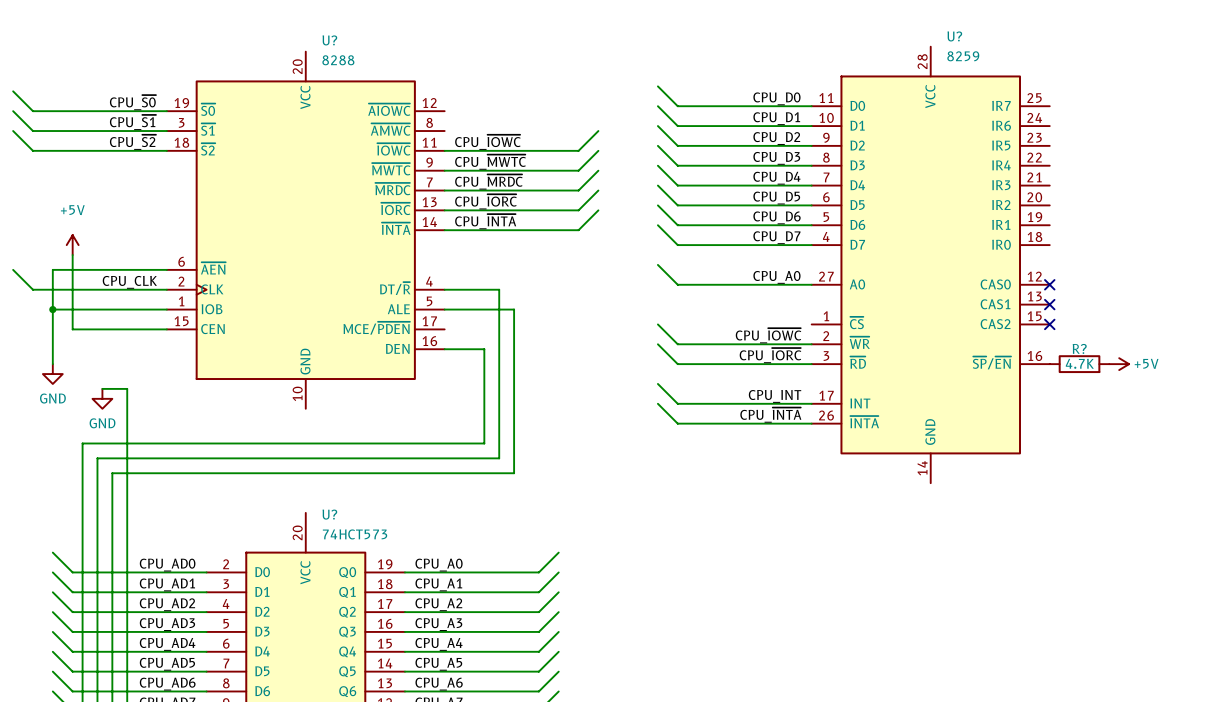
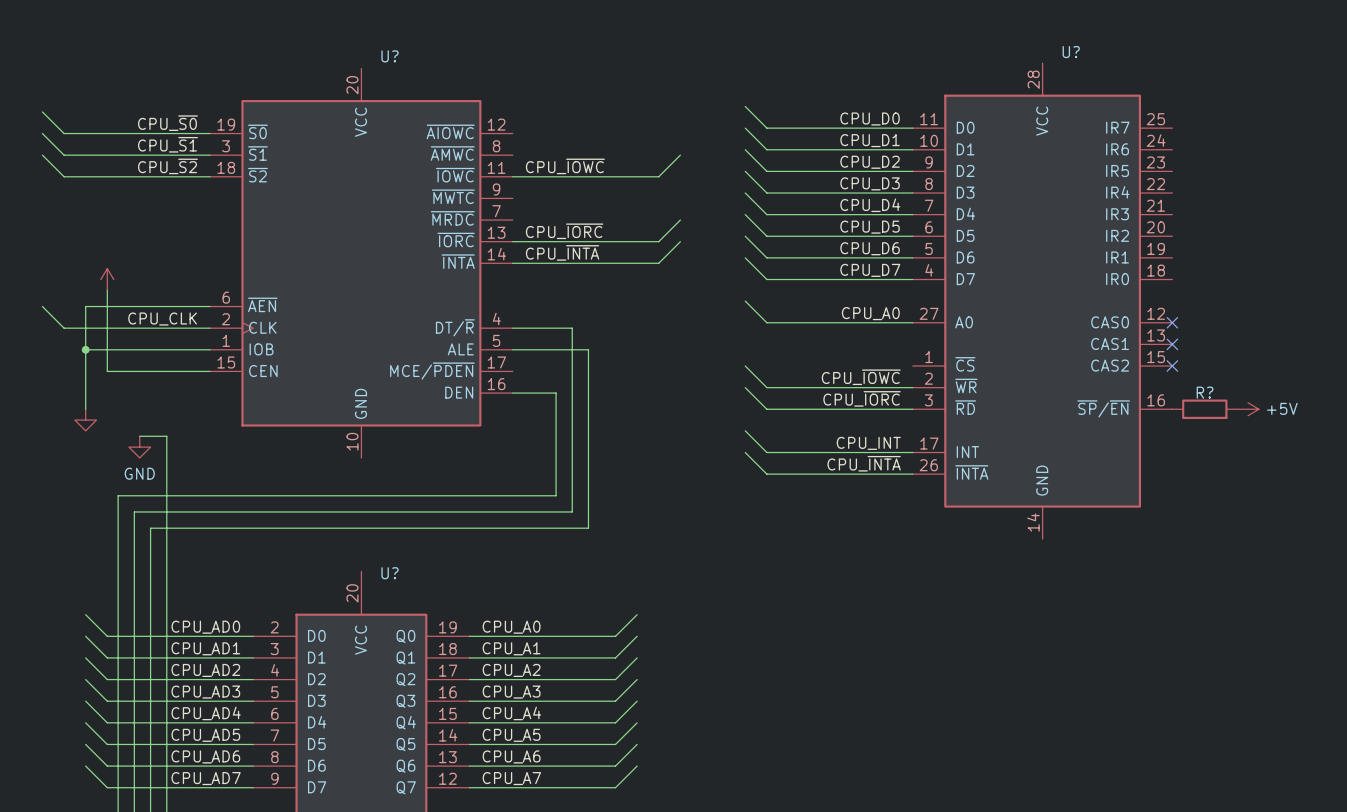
U? value: 8259 (963, 56) -> none
U? value: 8288 (338, 60) -> none
wire: (598, 150) (578, 170) (444, 170) -> none
label: CPU_~{MWTC} (490, 162) -> none
wire: (598, 170) (578, 190) (444, 190) -> none
label: CPU_~{MRDC} (488, 182) -> none
power symbol text: +5V (72, 210) -> none
R? value: 4.7K (1079, 363) -> none
power symbol text: GND (52, 398) -> none
U? value: 74HCT573 (355, 534) -> none

